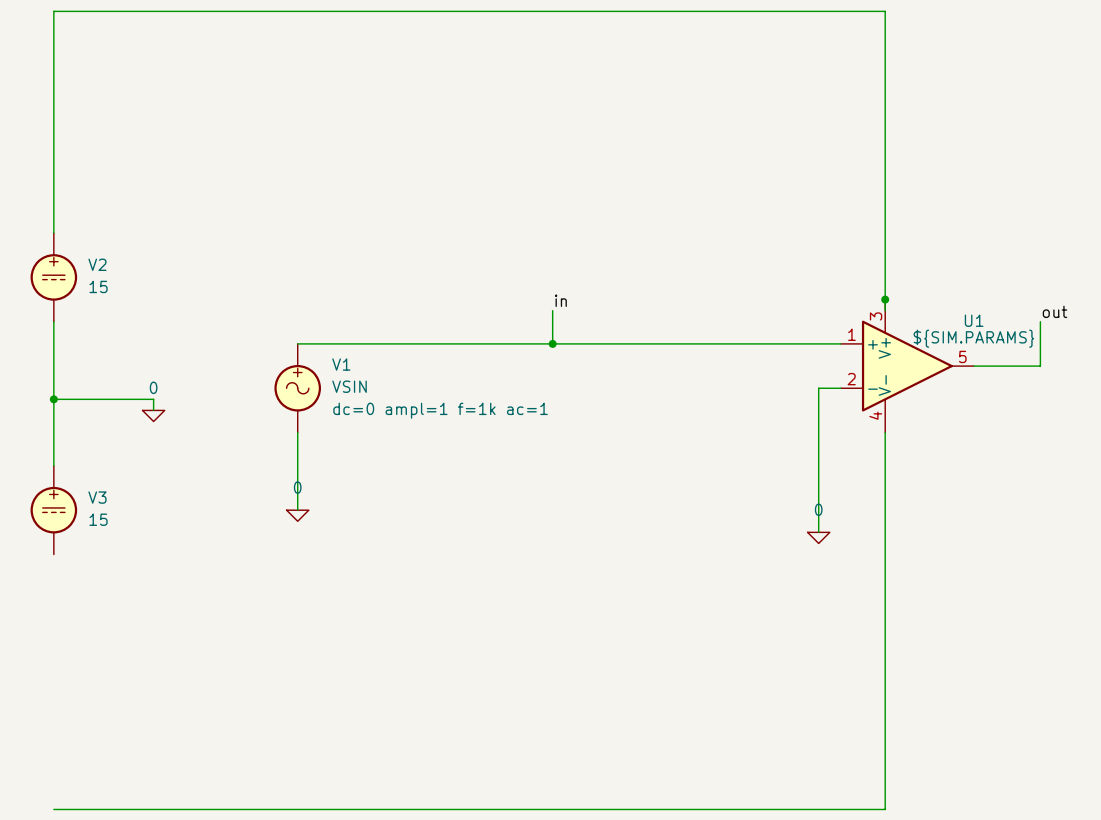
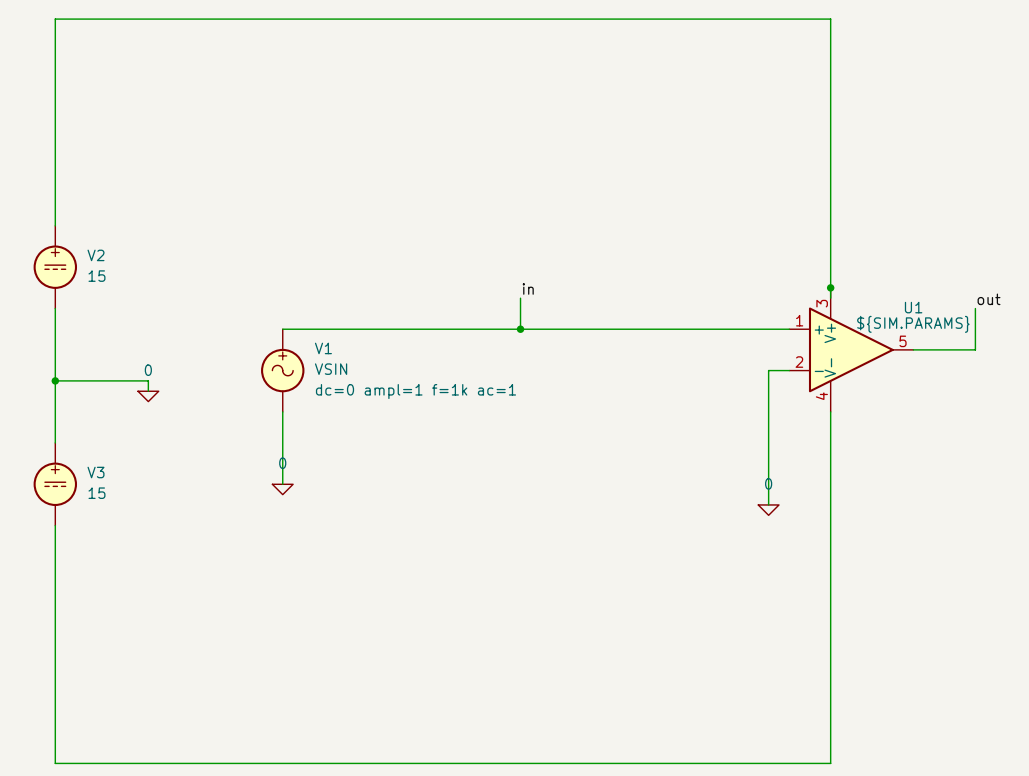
wire: none -> (55, 525) (55, 763)

